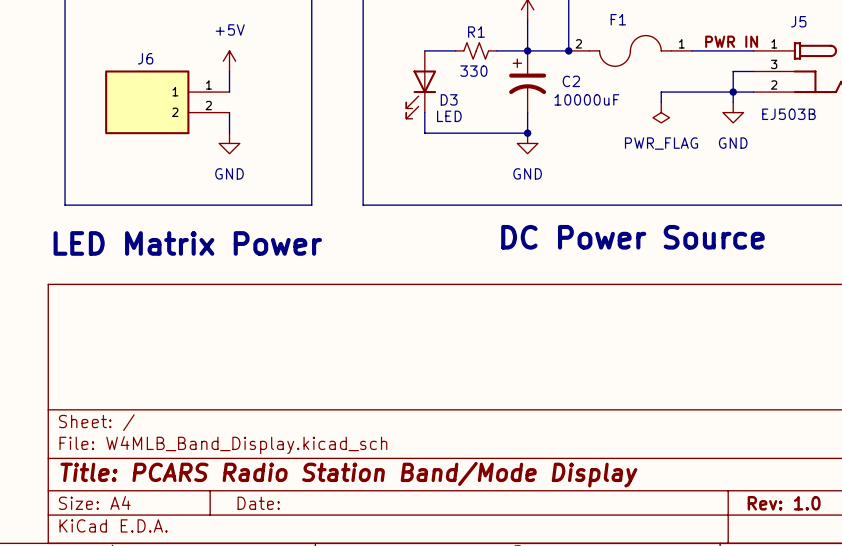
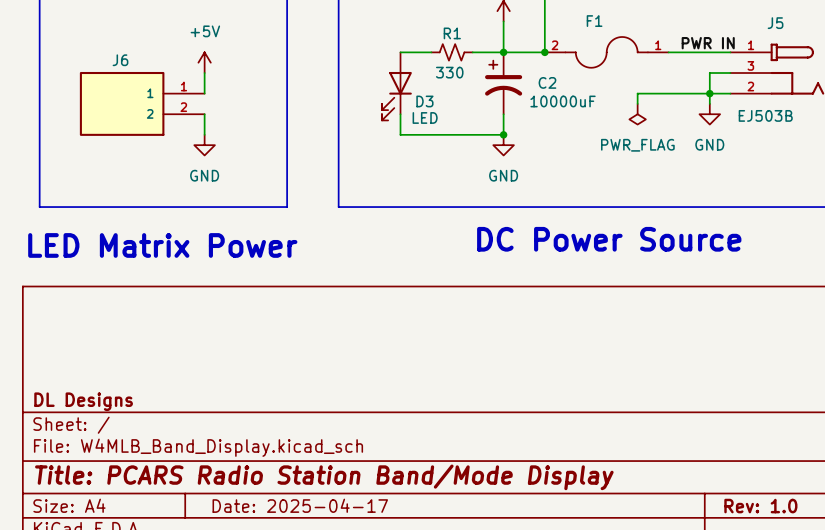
title block: none -> DL Designs (83, 401)
title block: Date: (258, 503) -> Date: 2025-04-17 (300, 505)

